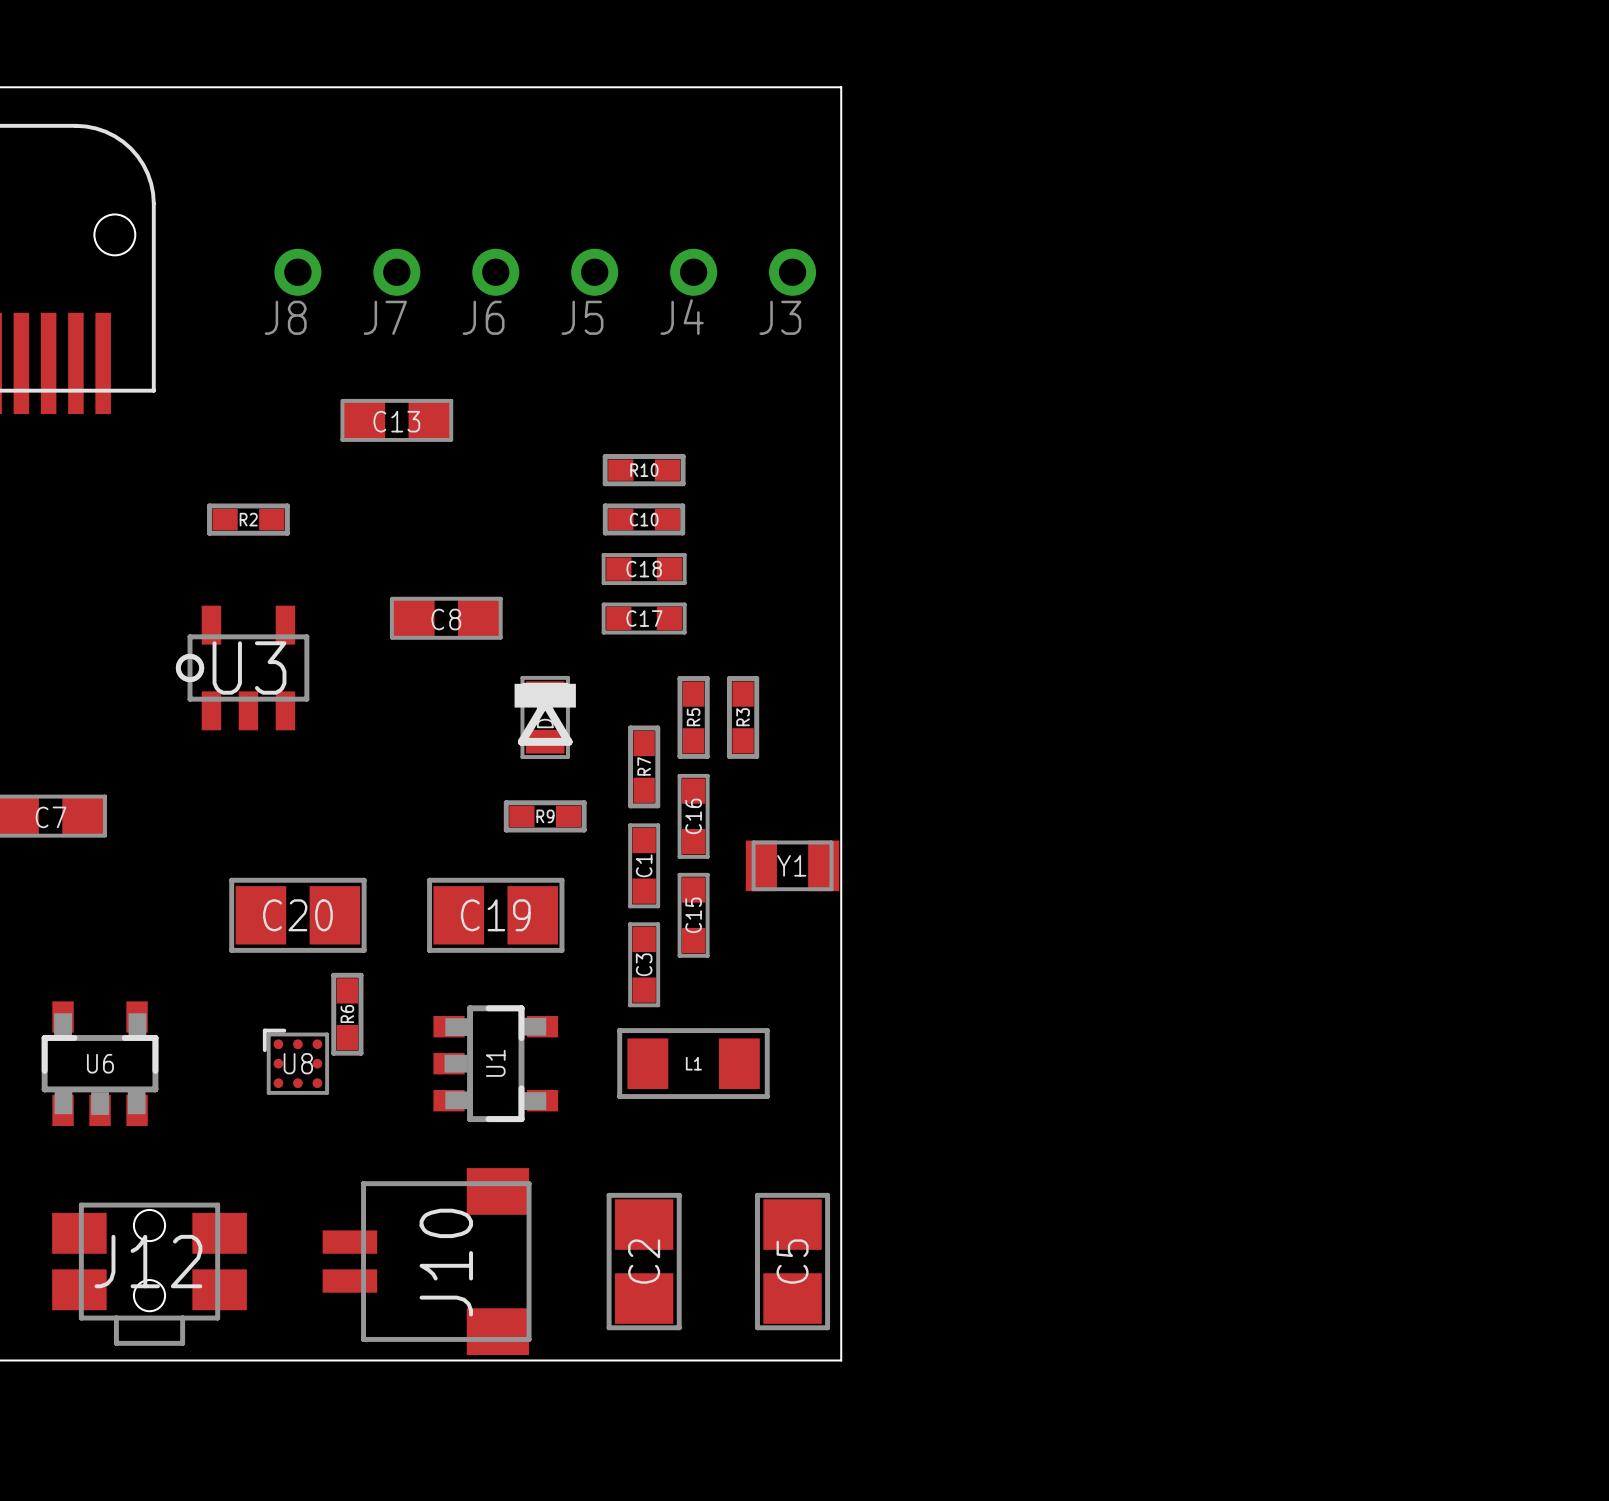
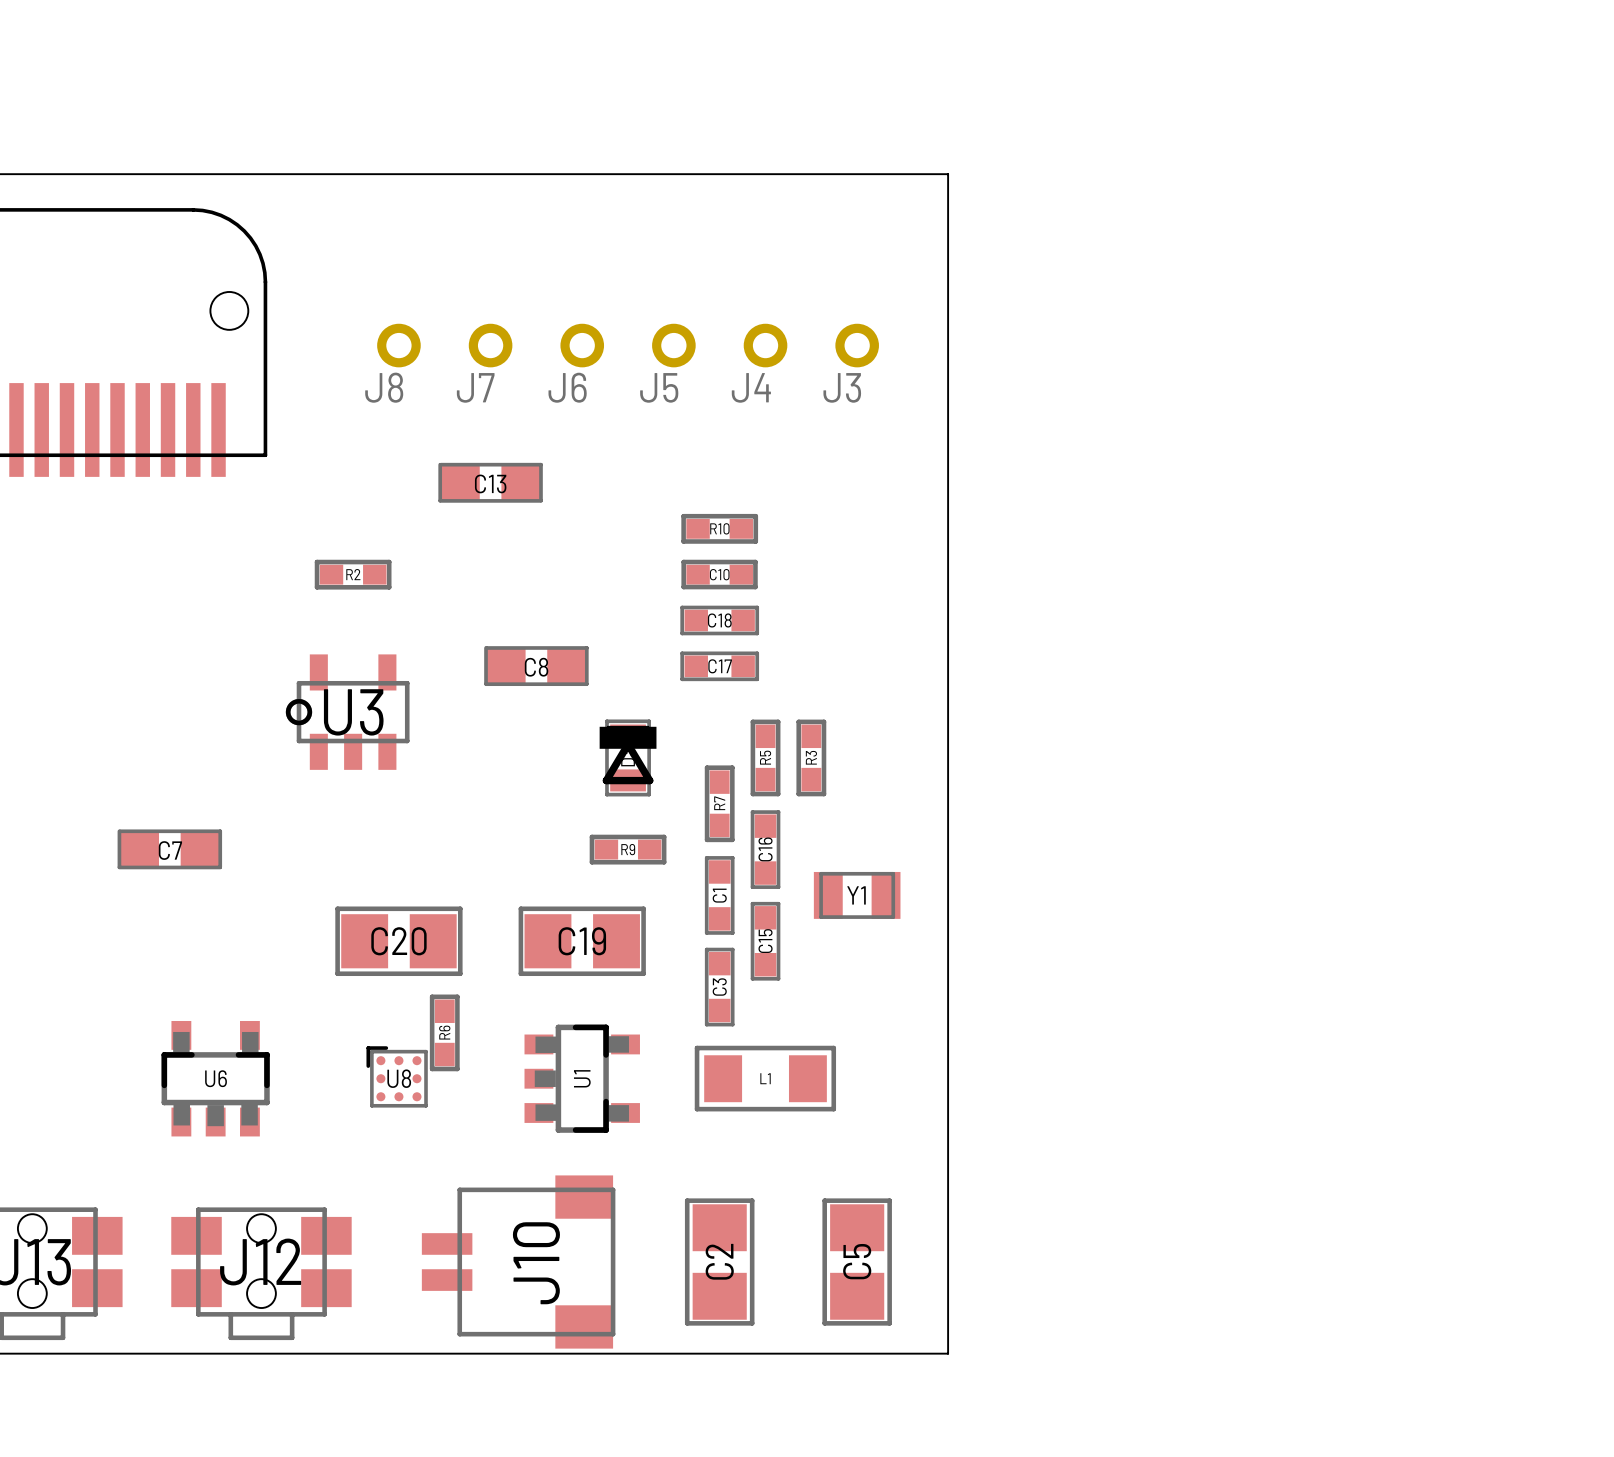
board edge: (841, 87) (841, 1360) -> (902, 174) (948, 174) (948, 1353) (902, 1353)

